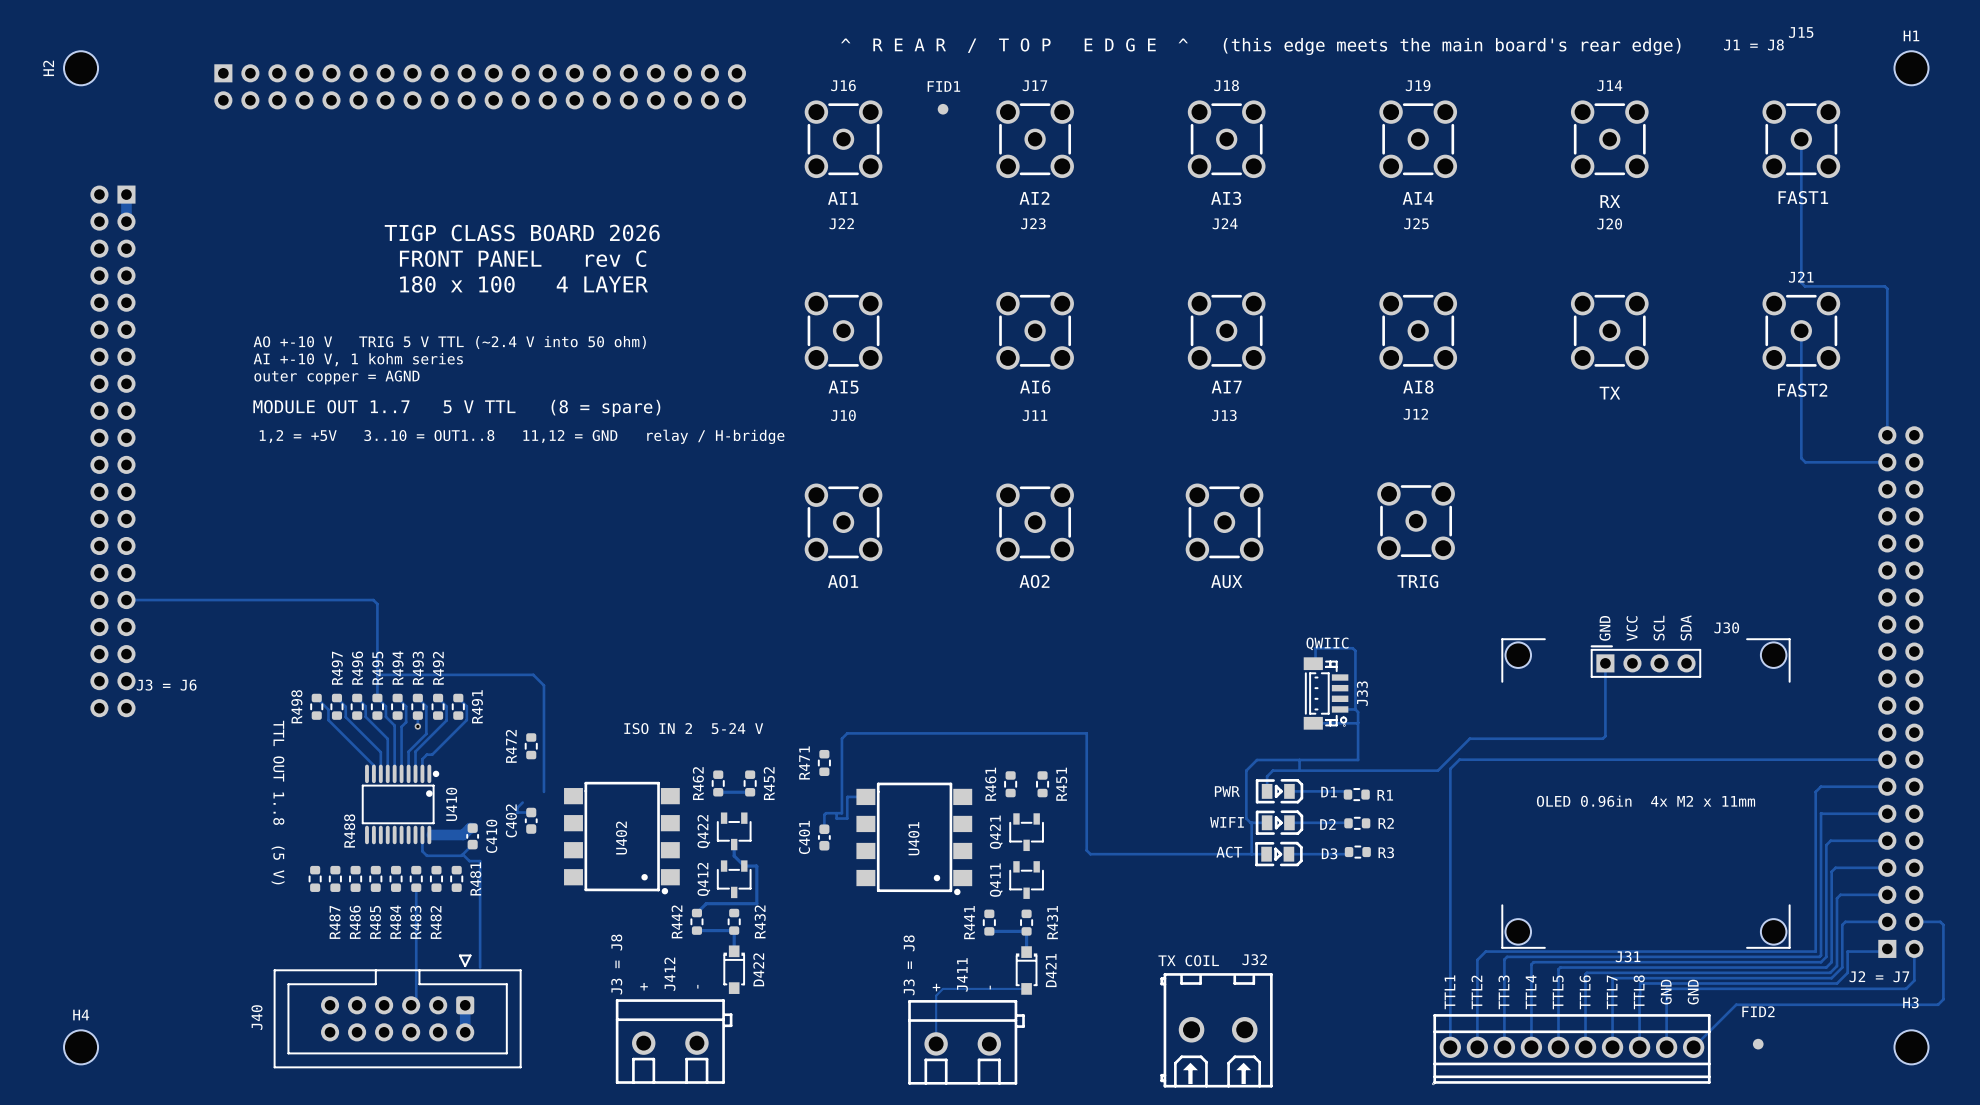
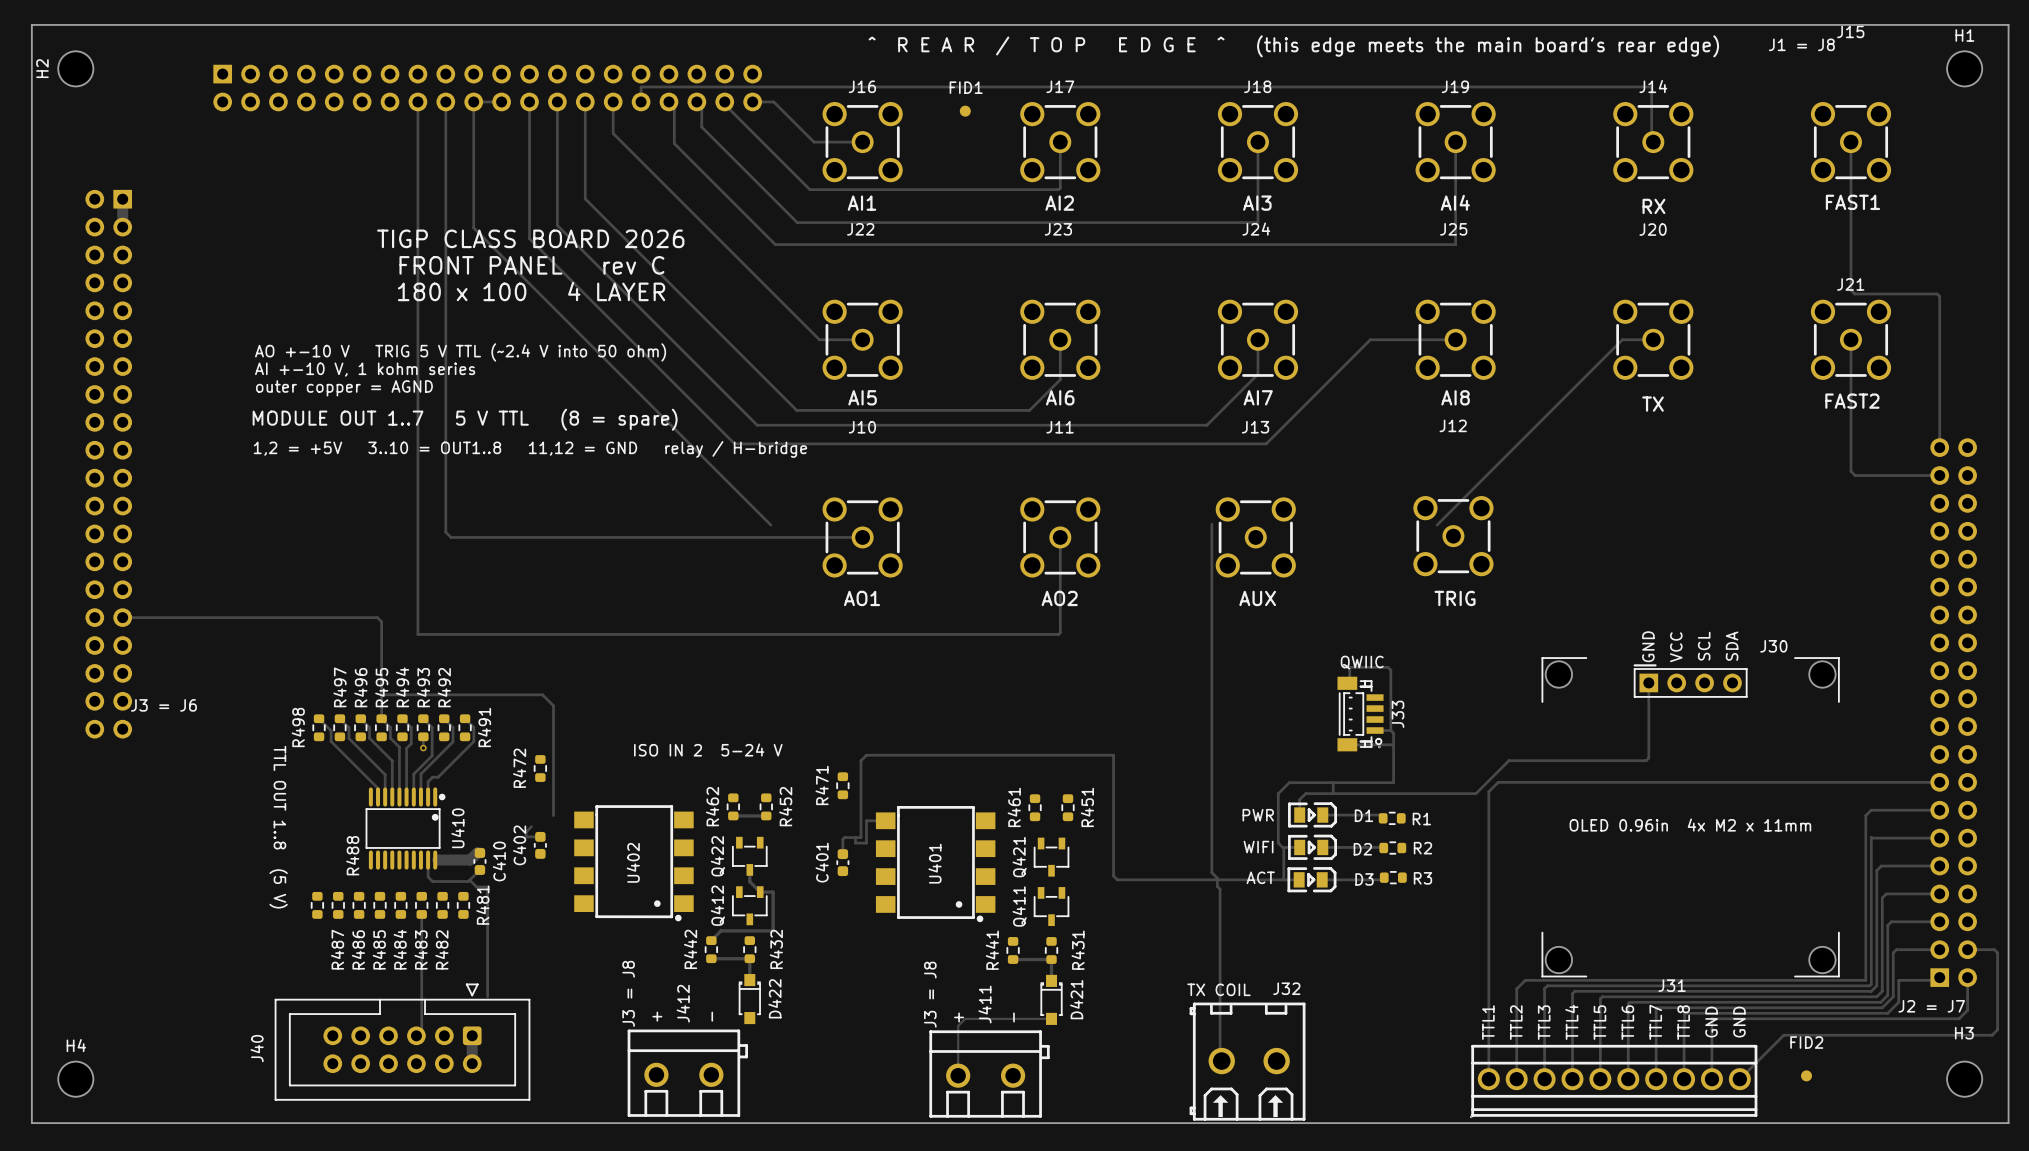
board edge: none -> (31, 24) (2008, 24) (2008, 1123) (31, 1123) (31, 24)
track: none -> (417, 101) (417, 634) (1058, 634) (1060, 632) (1060, 537)
track: none -> (445, 101) (445, 532) (451, 537) (862, 537)
track: none -> (501, 101) (473, 101) (473, 227) (770, 525)
track: none -> (529, 101) (529, 238) (734, 443) (1266, 443) (1370, 339) (1455, 339)
track: none -> (557, 101) (557, 225) (757, 425) (1206, 425) (1257, 374) (1257, 339)
track: none -> (585, 101) (585, 198) (796, 410) (1029, 410) (1060, 379) (1060, 339)
track: none -> (613, 101) (613, 133) (819, 339) (862, 339)
track: none -> (641, 101) (641, 86) (1651, 86) (1651, 140) (1653, 142)
track: none -> (668, 101) (674, 107) (674, 143) (775, 244) (1455, 244) (1455, 142) (1459, 145)
track: none -> (696, 101) (701, 106) (701, 127) (797, 222) (1257, 222) (1257, 142)
track: none -> (724, 101) (723, 103) (809, 189) (1058, 189) (1060, 188) (1060, 142)
track: none -> (752, 101) (773, 101) (813, 142) (862, 142)
track: none -> (1653, 339) (1622, 339) (1437, 525)
track: none -> (1211, 524) (1211, 872) (1217, 878) (1217, 886) (1220, 889) (1220, 1048)

